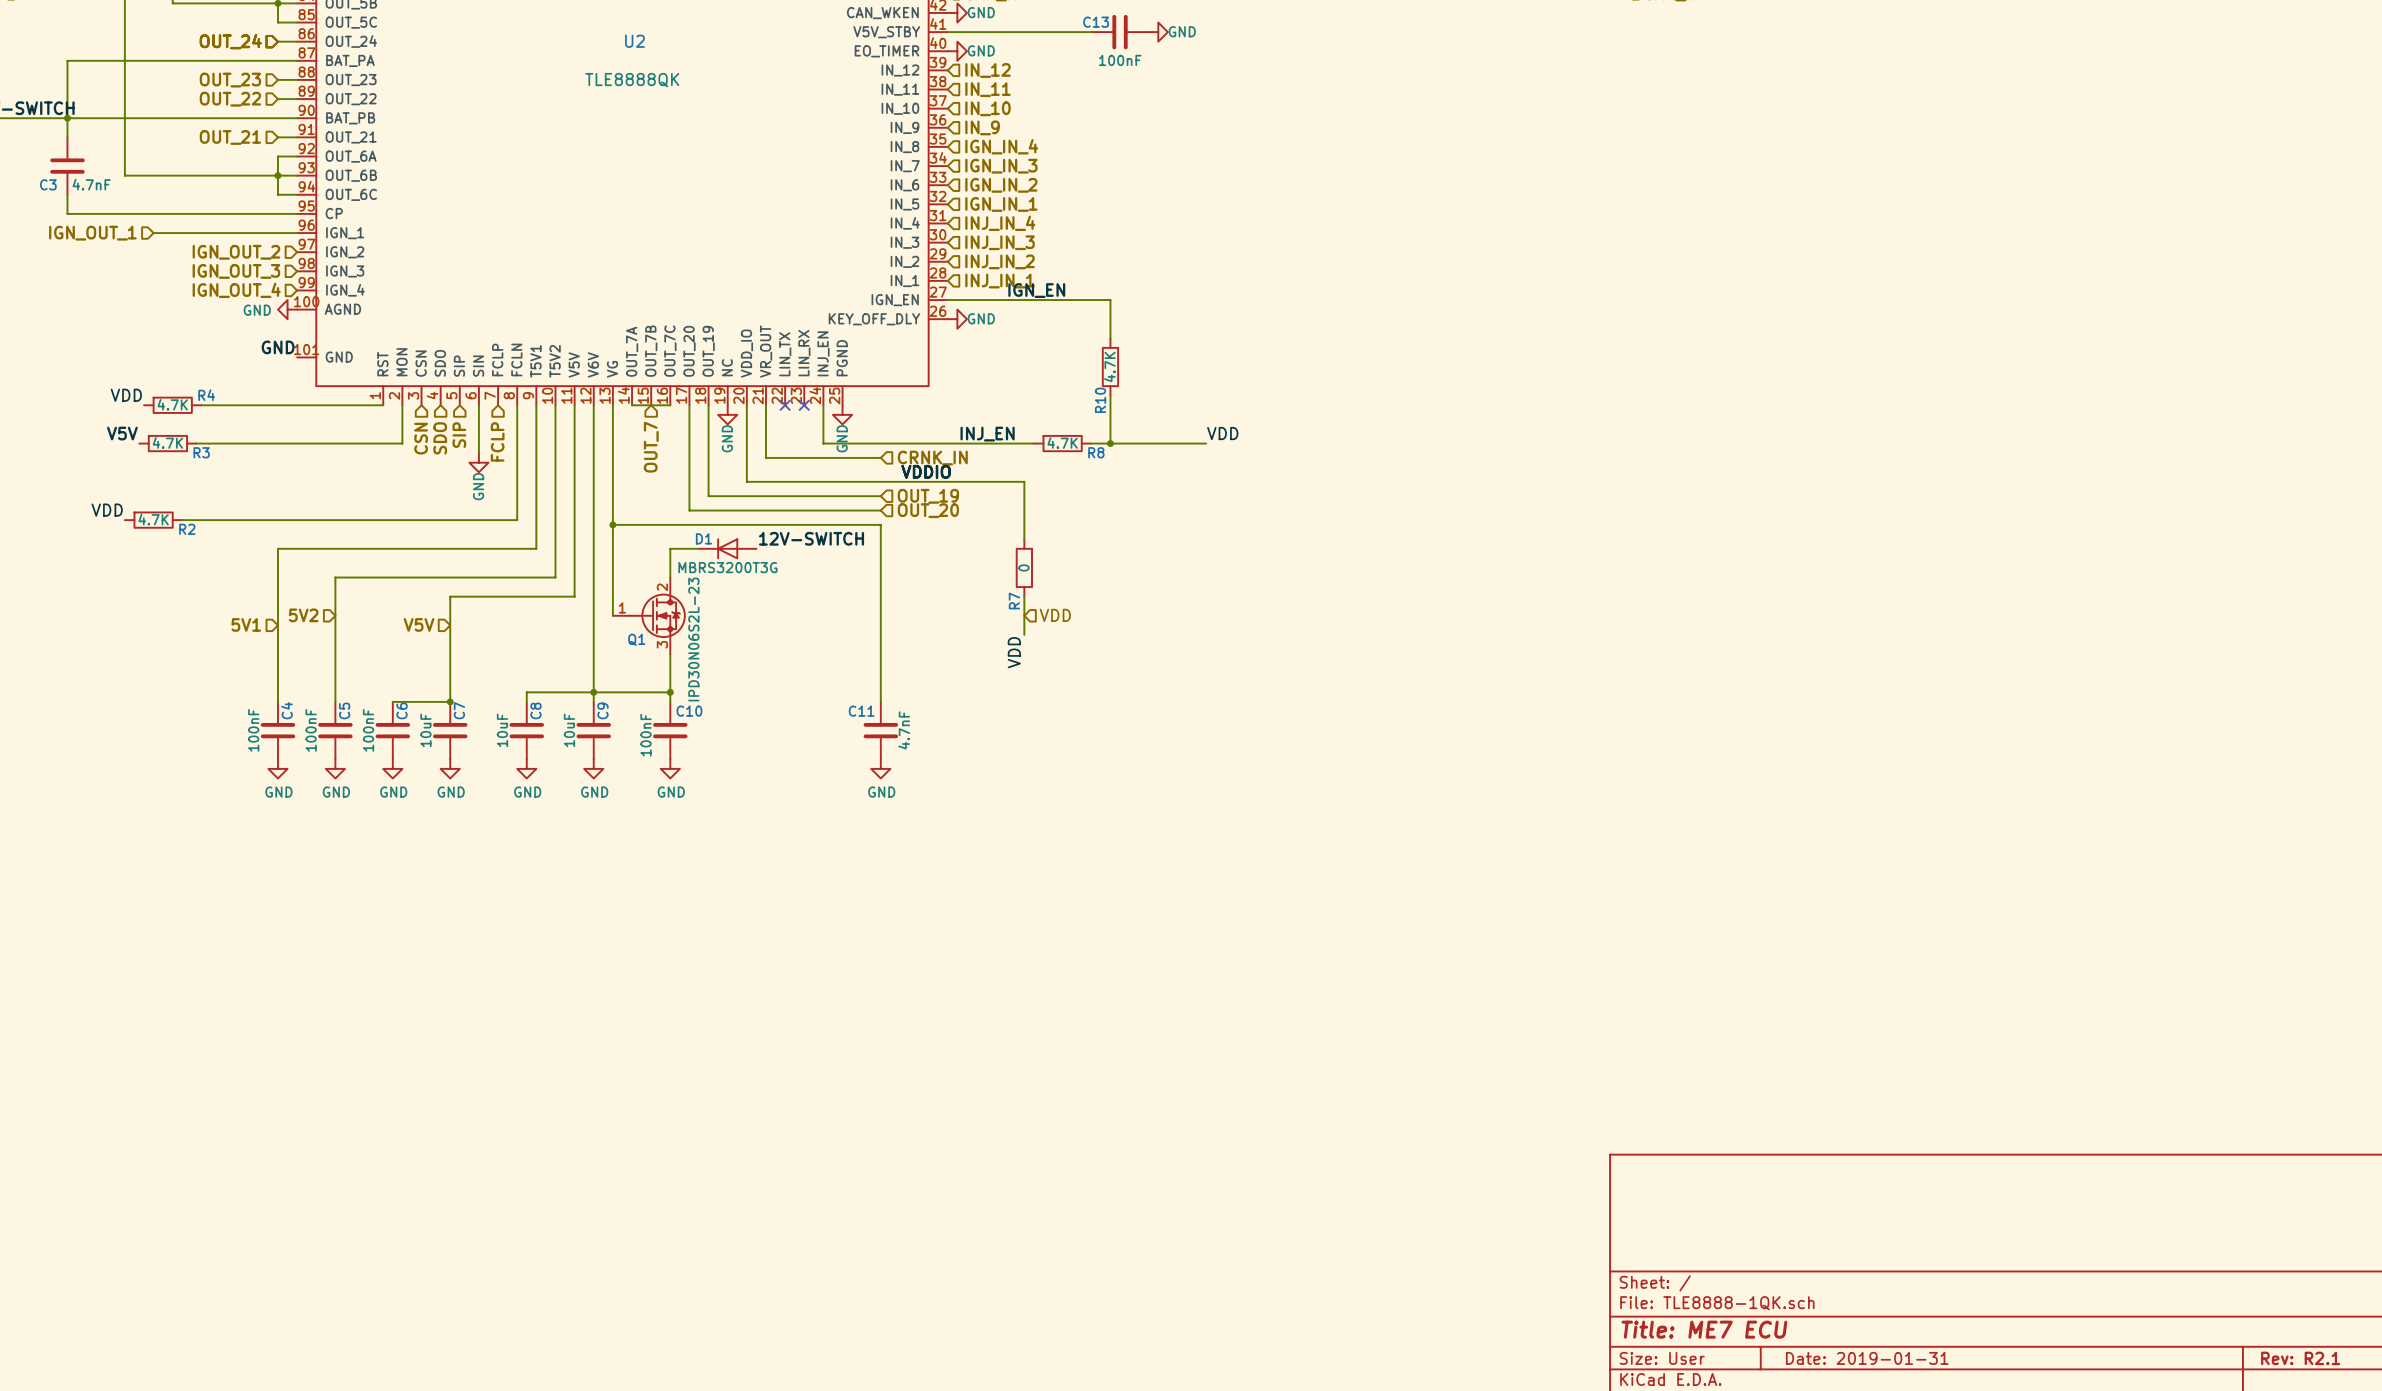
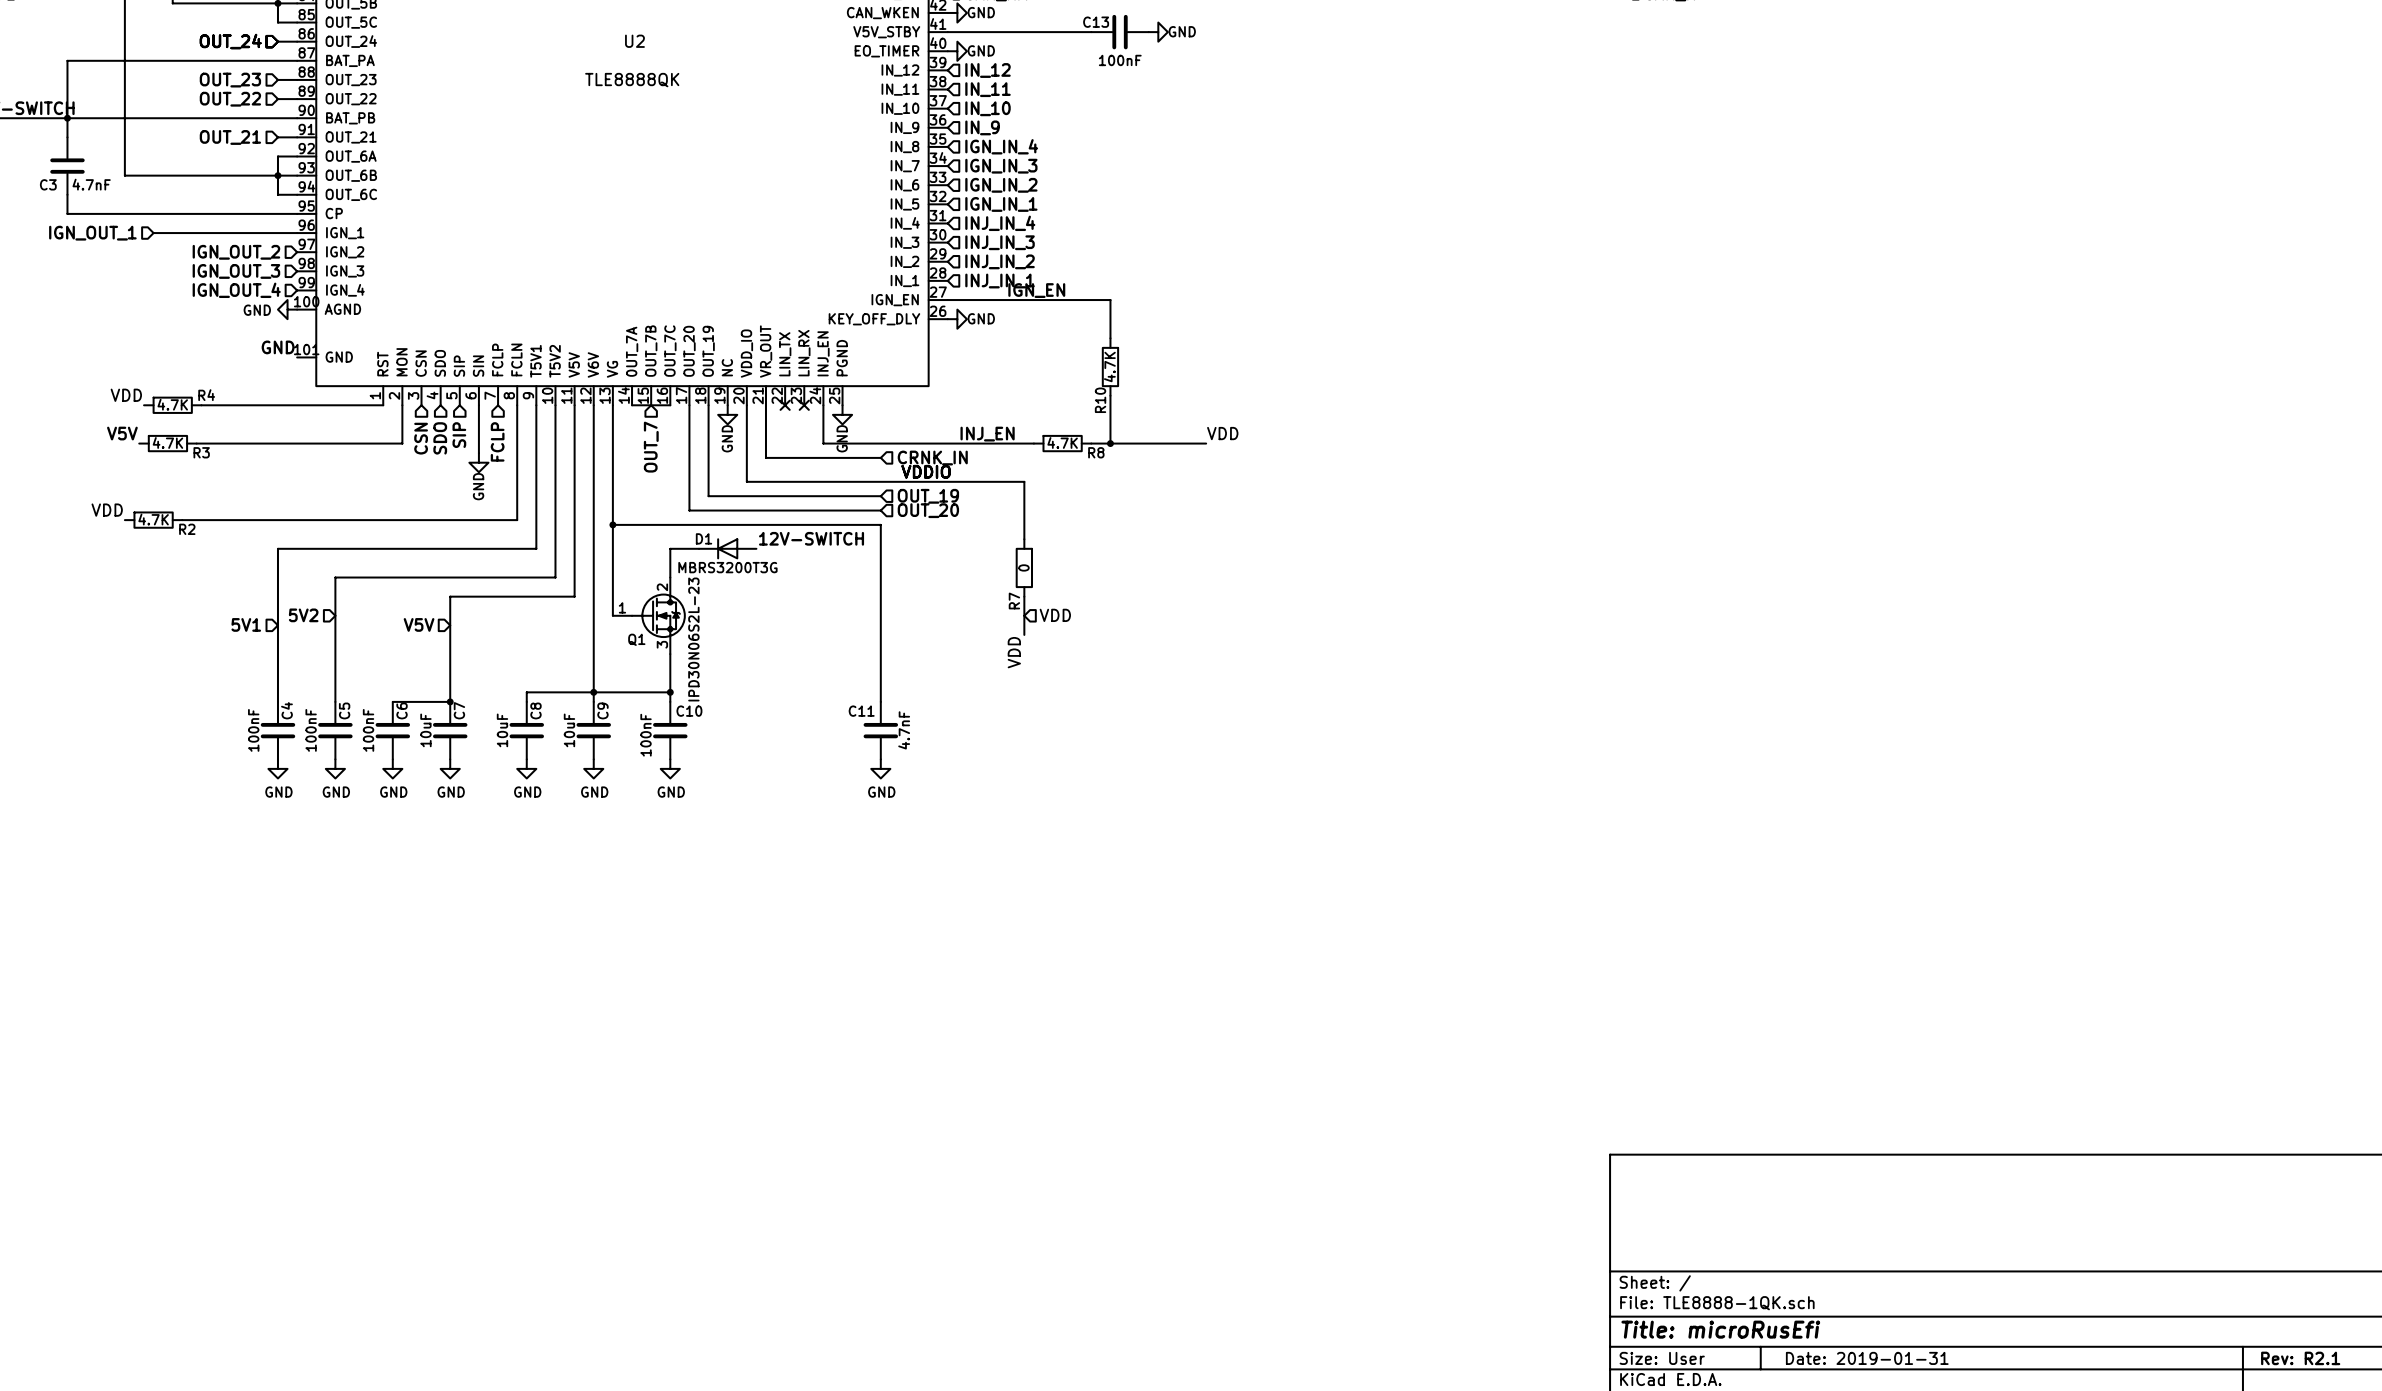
title block: Title: ME7 ECU (1704, 1329) -> Title: microRusEfi (1720, 1329)

